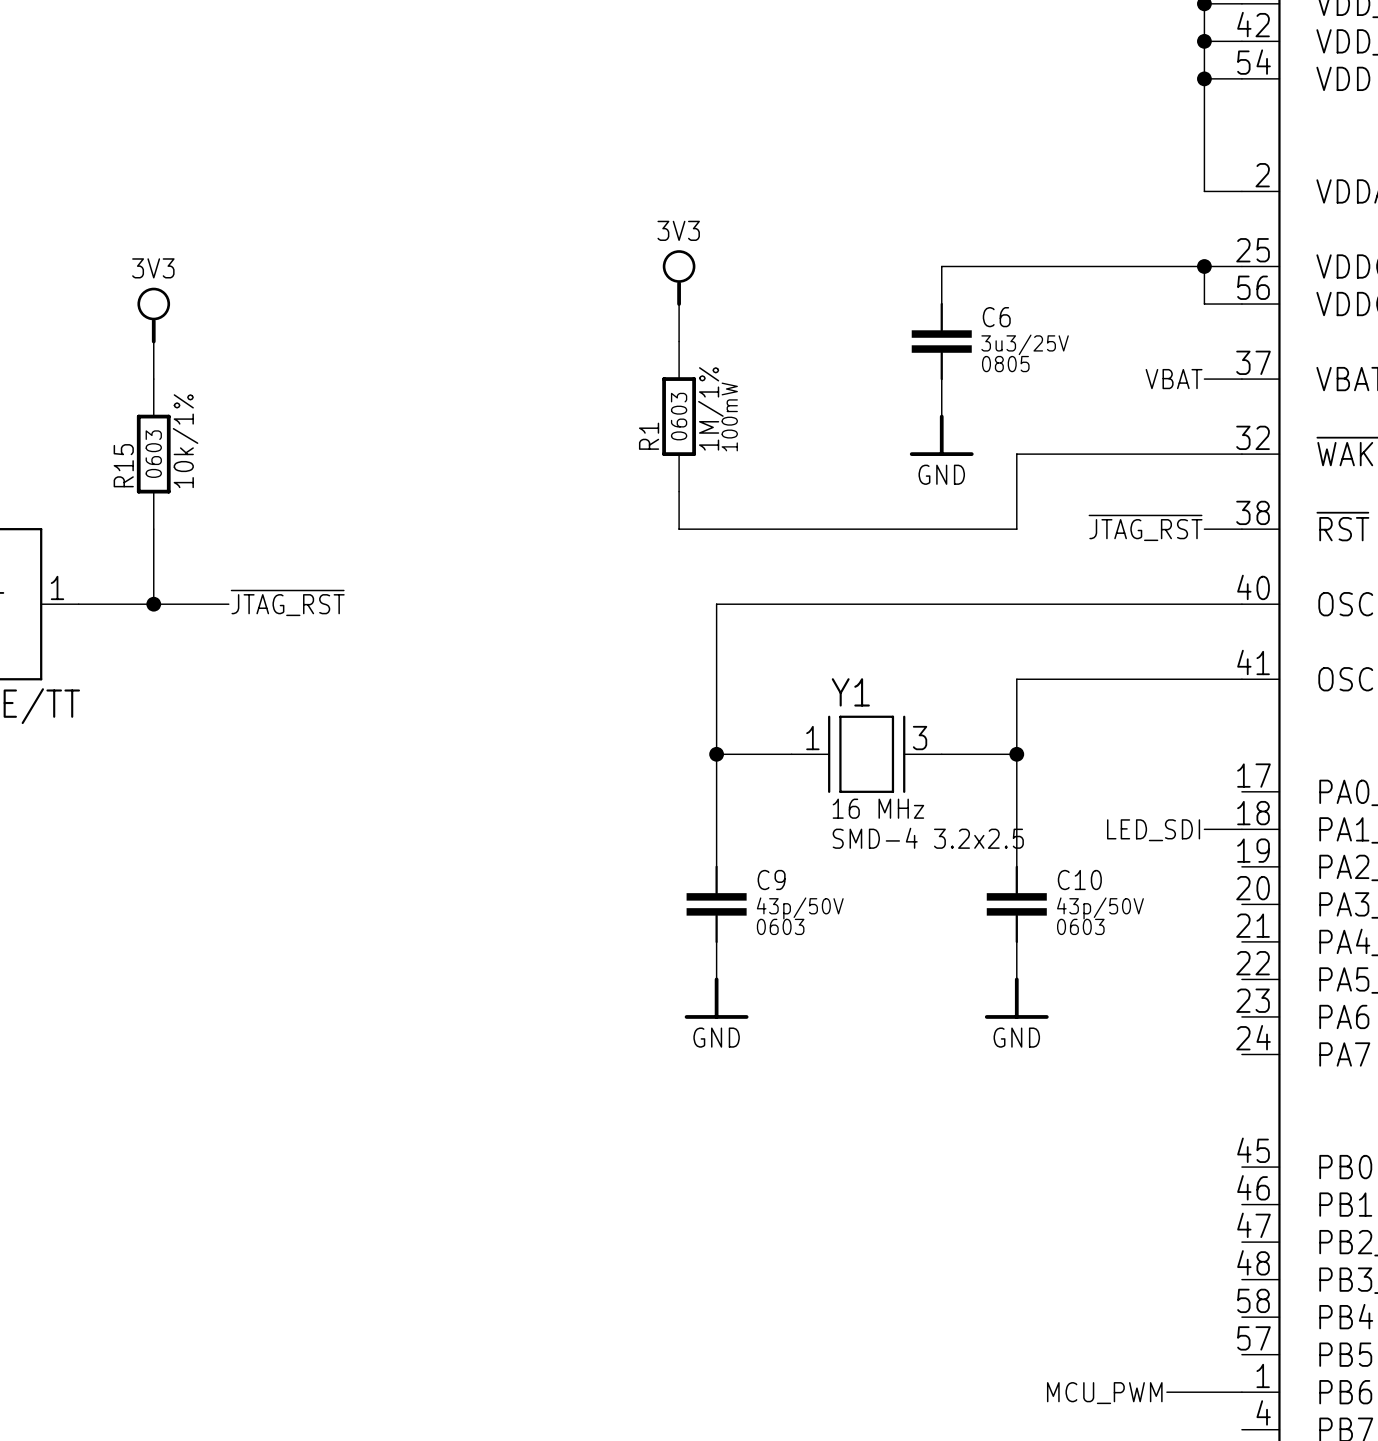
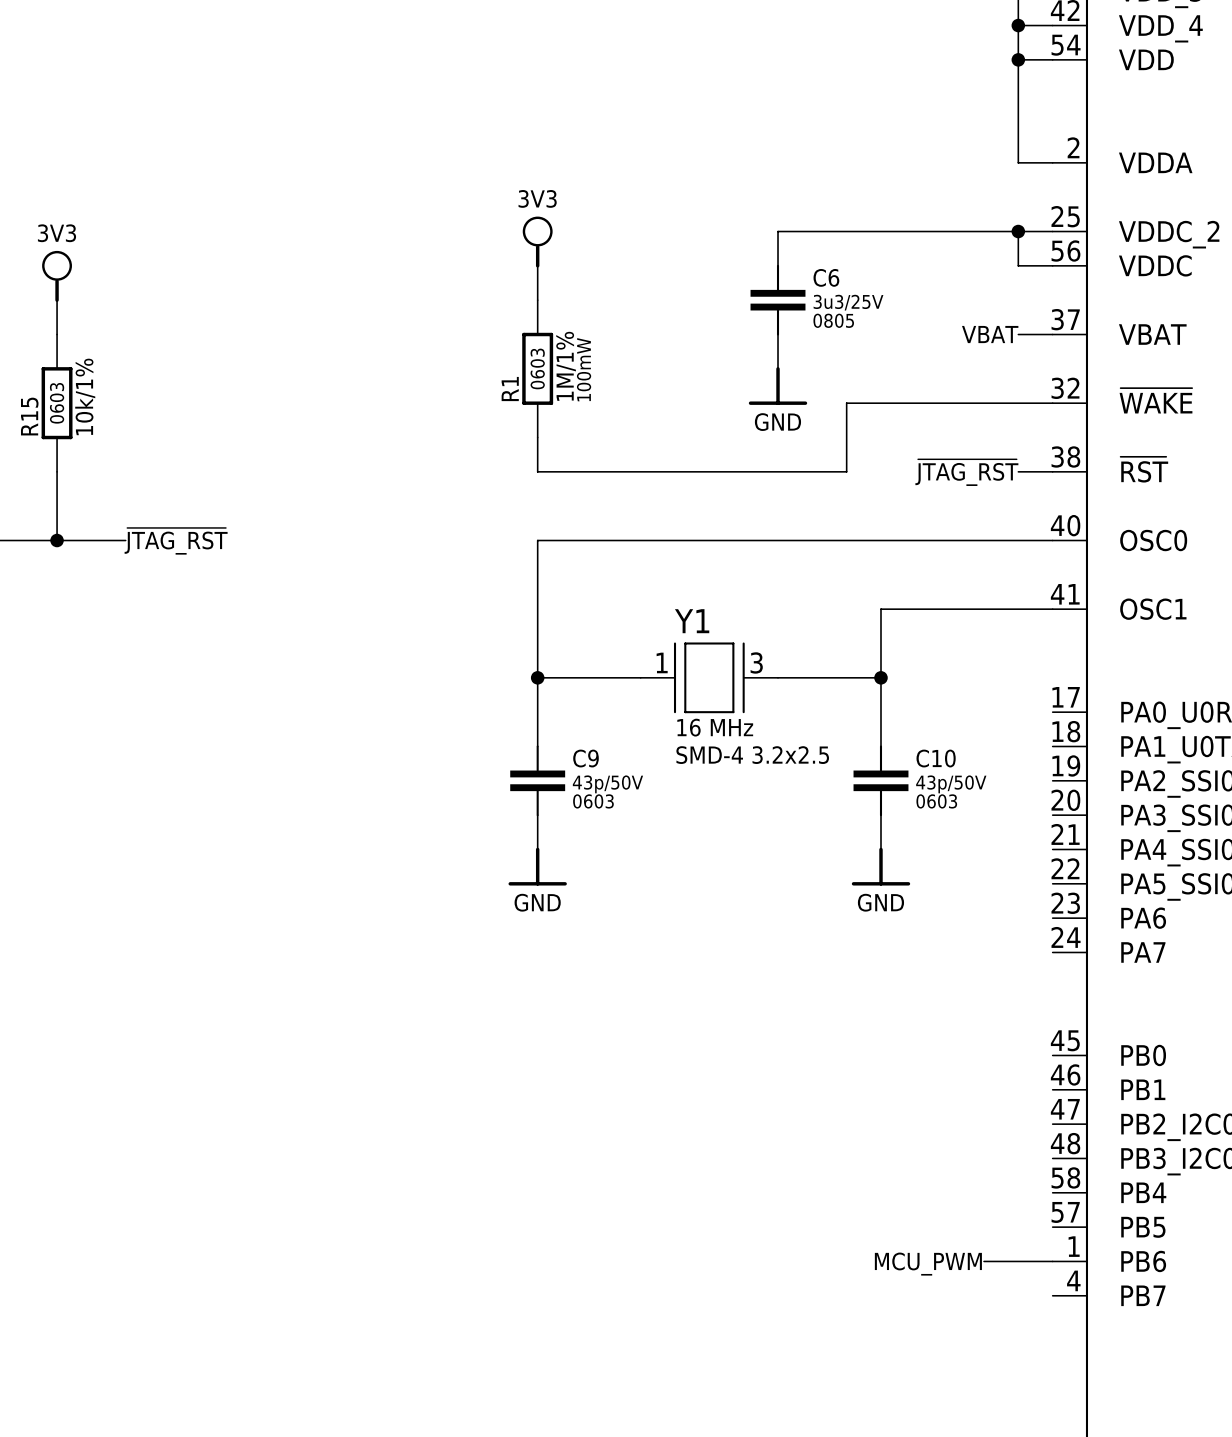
wire: (716, 604) (716, 866) -> (572, 540) (537, 540) (537, 746)
wire: (1054, 679) (1016, 679) (1016, 866) -> (880, 609) (880, 746)
wire: none -> (537, 677) (572, 677)
junction position: (716, 754) -> (537, 677)
junction position: (1016, 754) -> (880, 677)
wire: (1204, 829) (1241, 829) -> (846, 677) (880, 677)
label: LED_SDI (1153, 830) -> none
C9 position: (716, 904) -> (537, 780)
C10 position: (1016, 904) -> (880, 780)
wire: (716, 941) (716, 979) -> (537, 815) (537, 849)
wire: (1016, 941) (1016, 979) -> (880, 815) (880, 849)
power symbol position: GND (716, 998) -> GND (537, 866)
power symbol position: GND (1016, 998) -> GND (880, 866)

